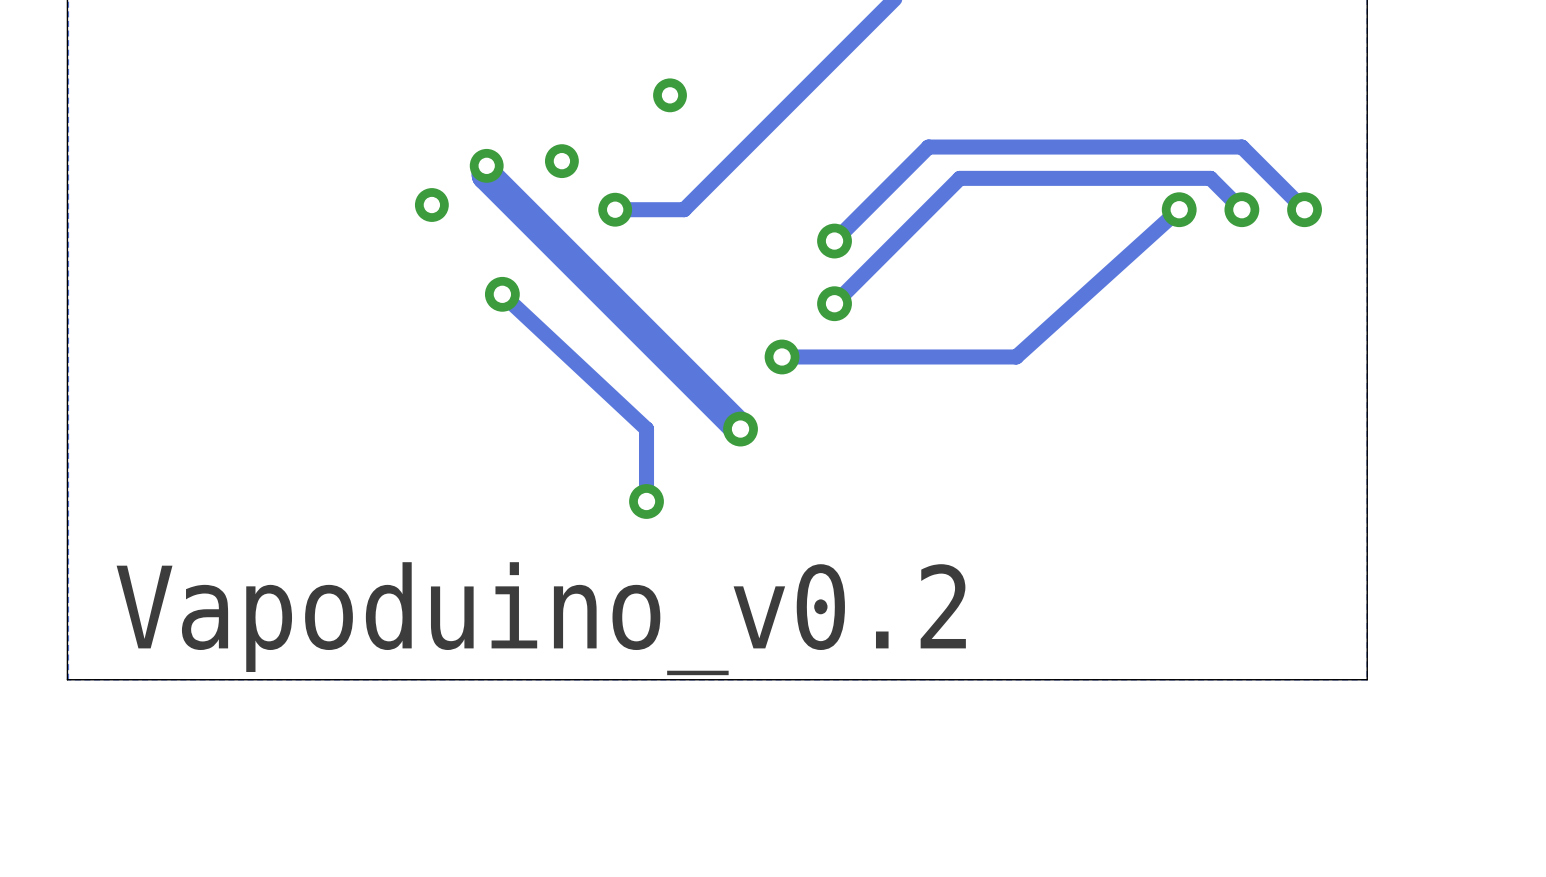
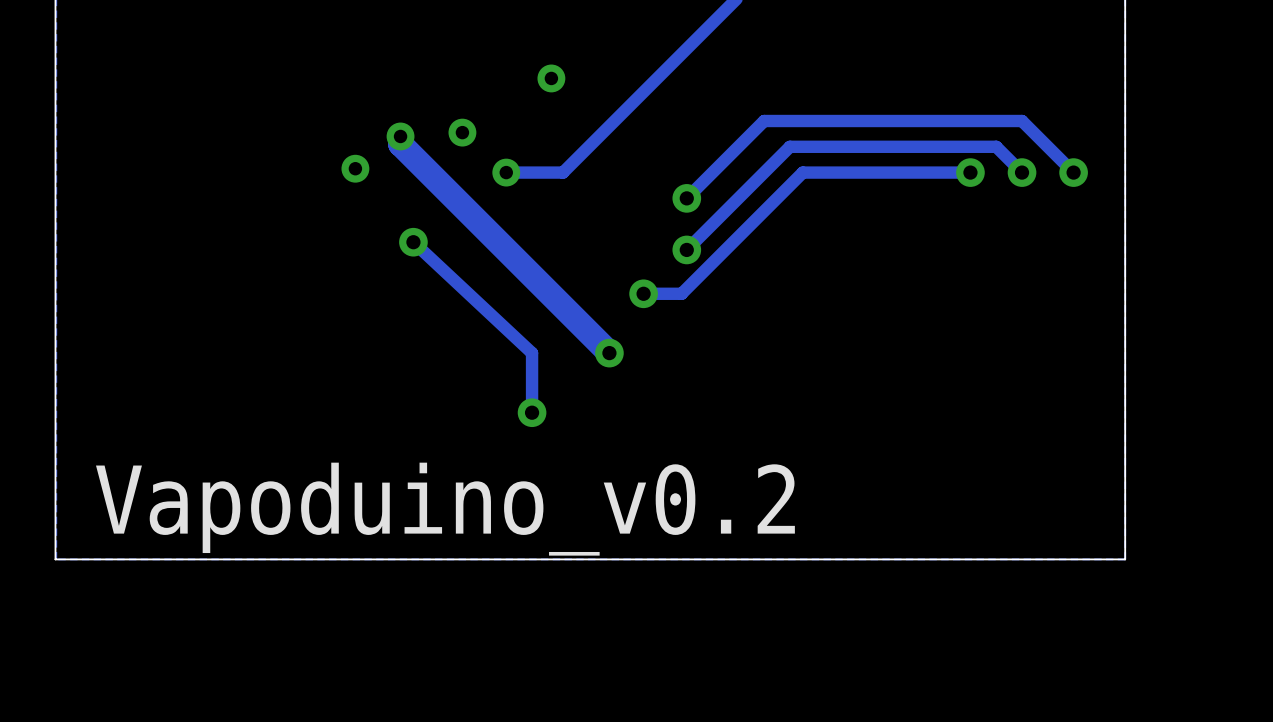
track: (1179, 209) (1016, 356) (828, 356) -> (970, 172) (802, 172) (681, 293)

